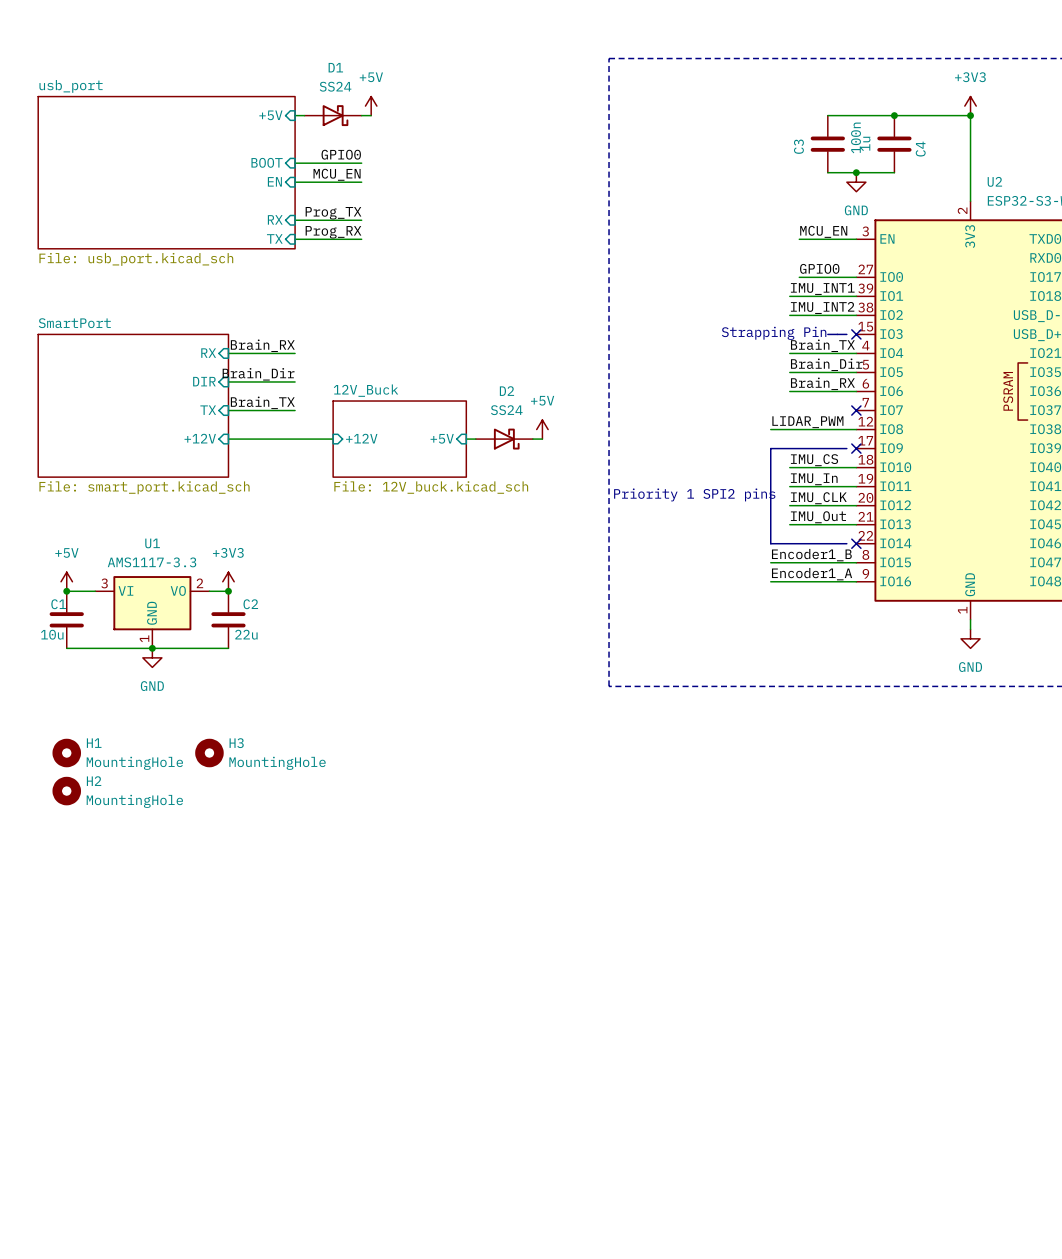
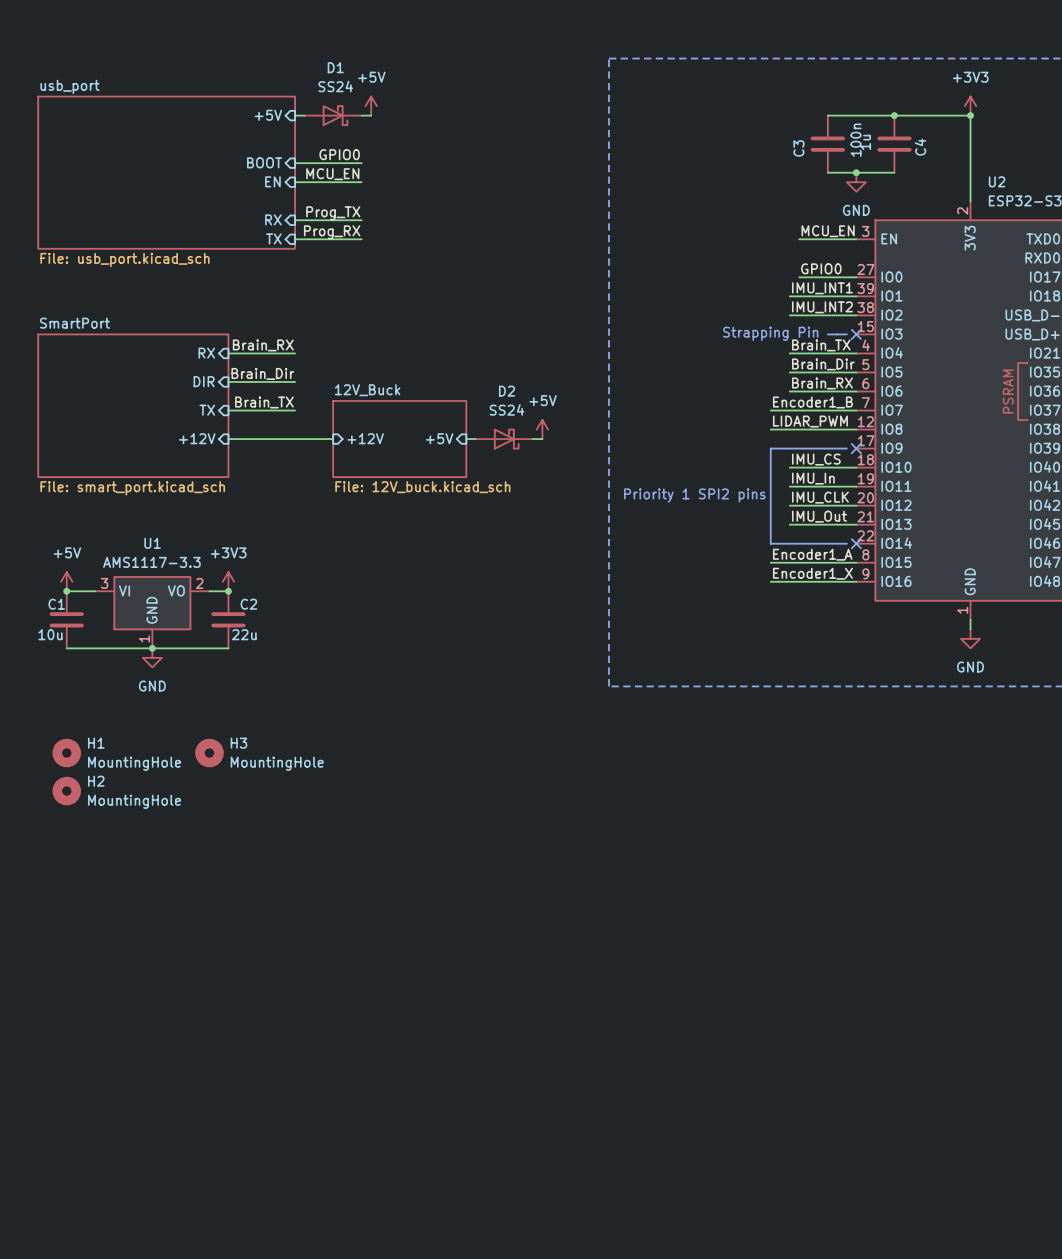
label: none -> Encoder1_B (812, 402)
wire: none -> (770, 410) (856, 410)
no-connect mark: (856, 410) -> none
label: Encoder1_B (811, 555) -> Encoder1_A (812, 554)
label: Encoder1_A (812, 574) -> Encoder1_X (812, 573)

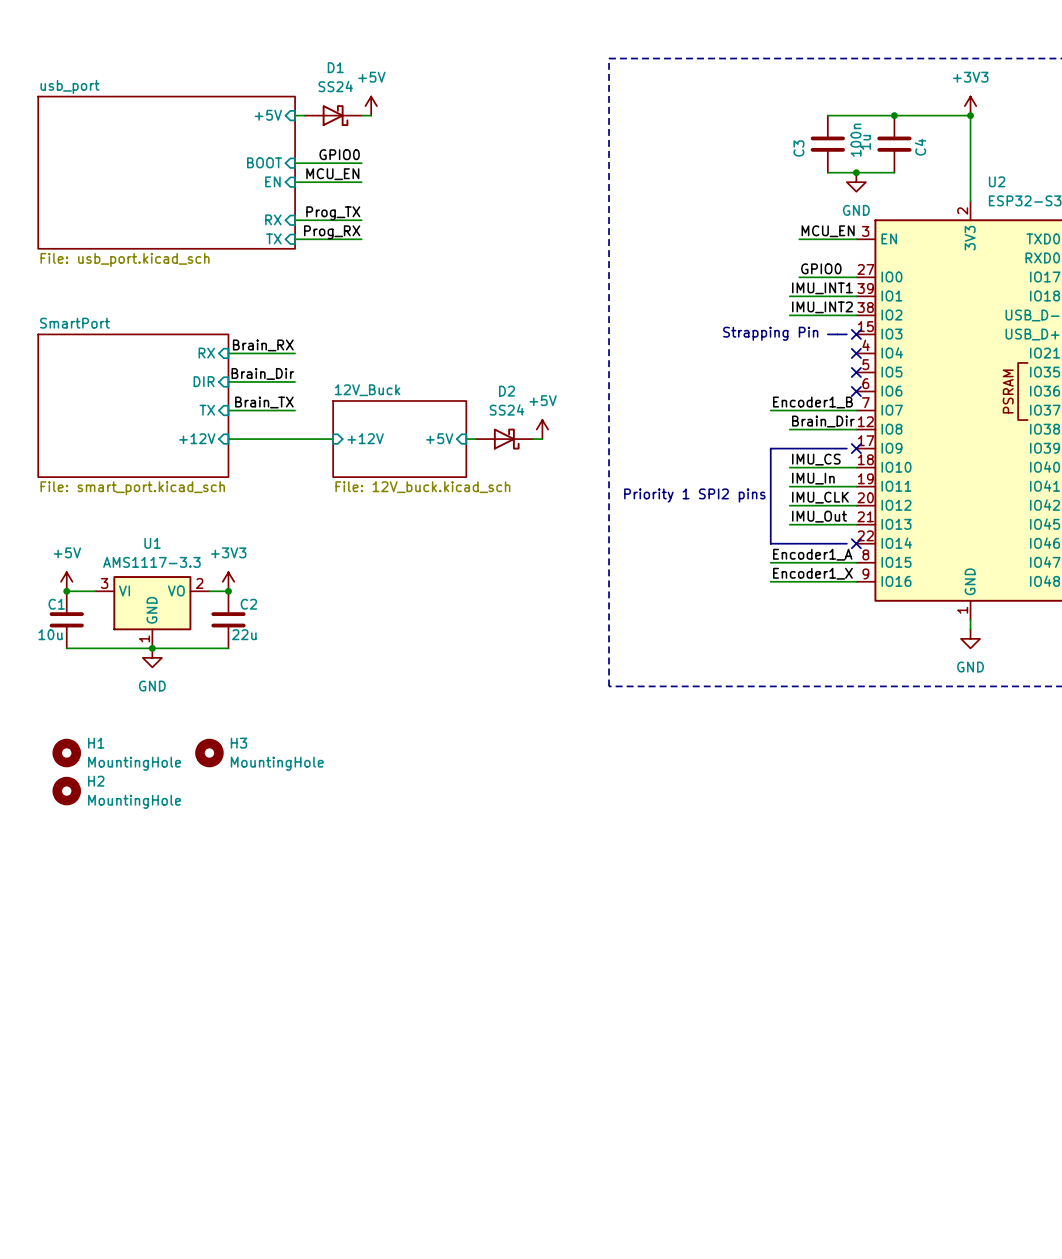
label: Brain_TX (821, 345) -> none
wire: (789, 353) (856, 353) -> none
no-connect mark: none -> (856, 353)
label position: Brain_Dir (823, 364) -> Brain_Dir (823, 421)
wire: (789, 372) (856, 372) -> none
no-connect mark: none -> (856, 372)
label: Brain_RX (822, 383) -> none
wire: (789, 391) (856, 391) -> none
no-connect mark: none -> (856, 391)
label: LIDAR_PWM (810, 421) -> none
wire: (770, 429) (789, 429) -> none

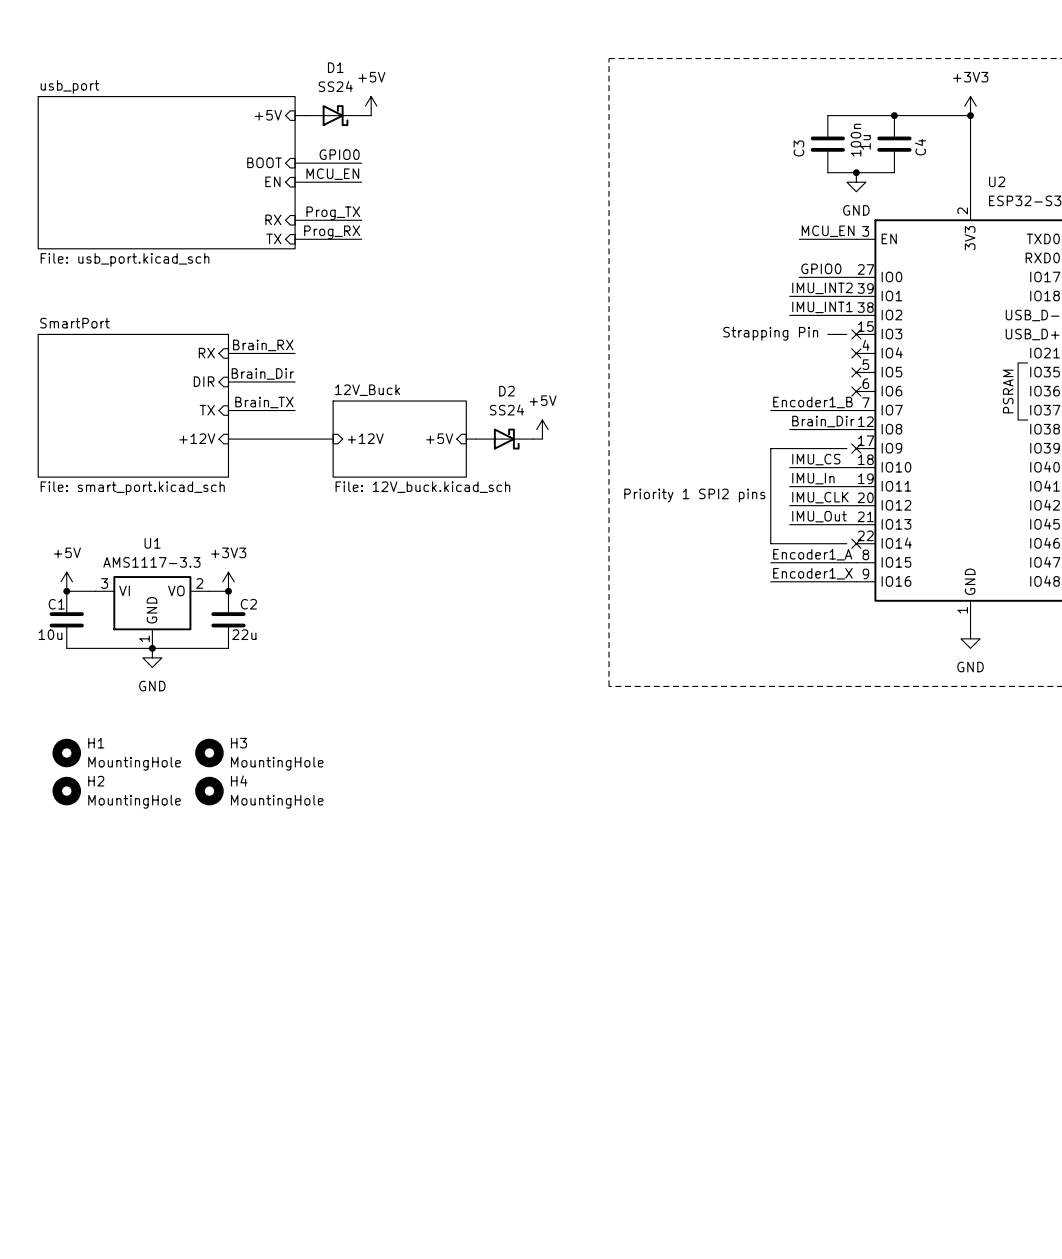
label: IMU_INT1 (822, 288) -> IMU_INT2 (822, 288)
label: IMU_INT2 (822, 307) -> IMU_INT1 (822, 307)
H4: none -> MountingHole (209, 791)

